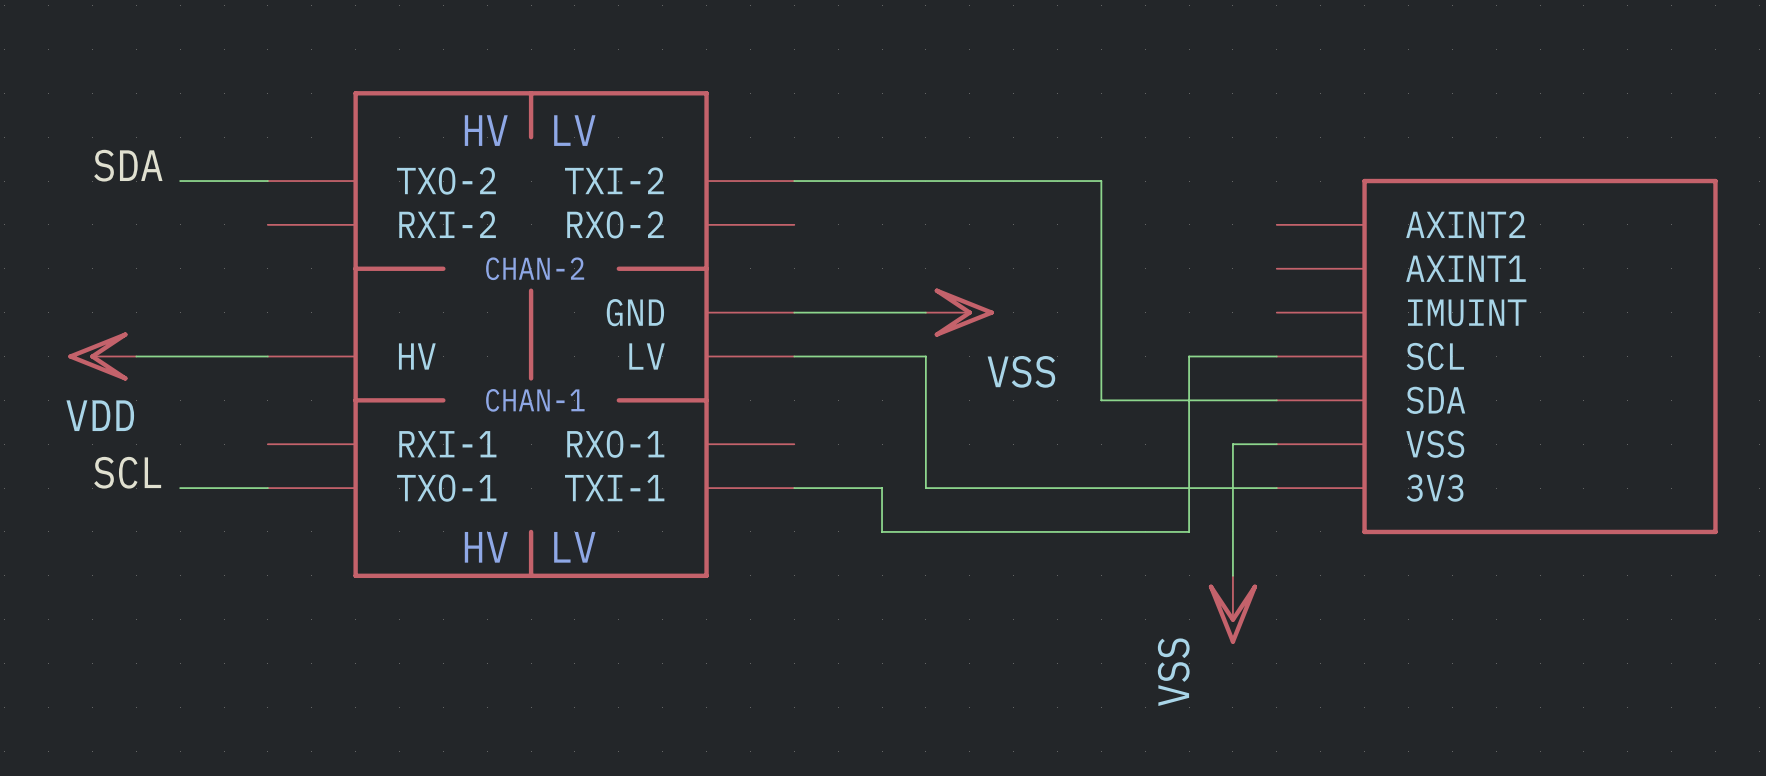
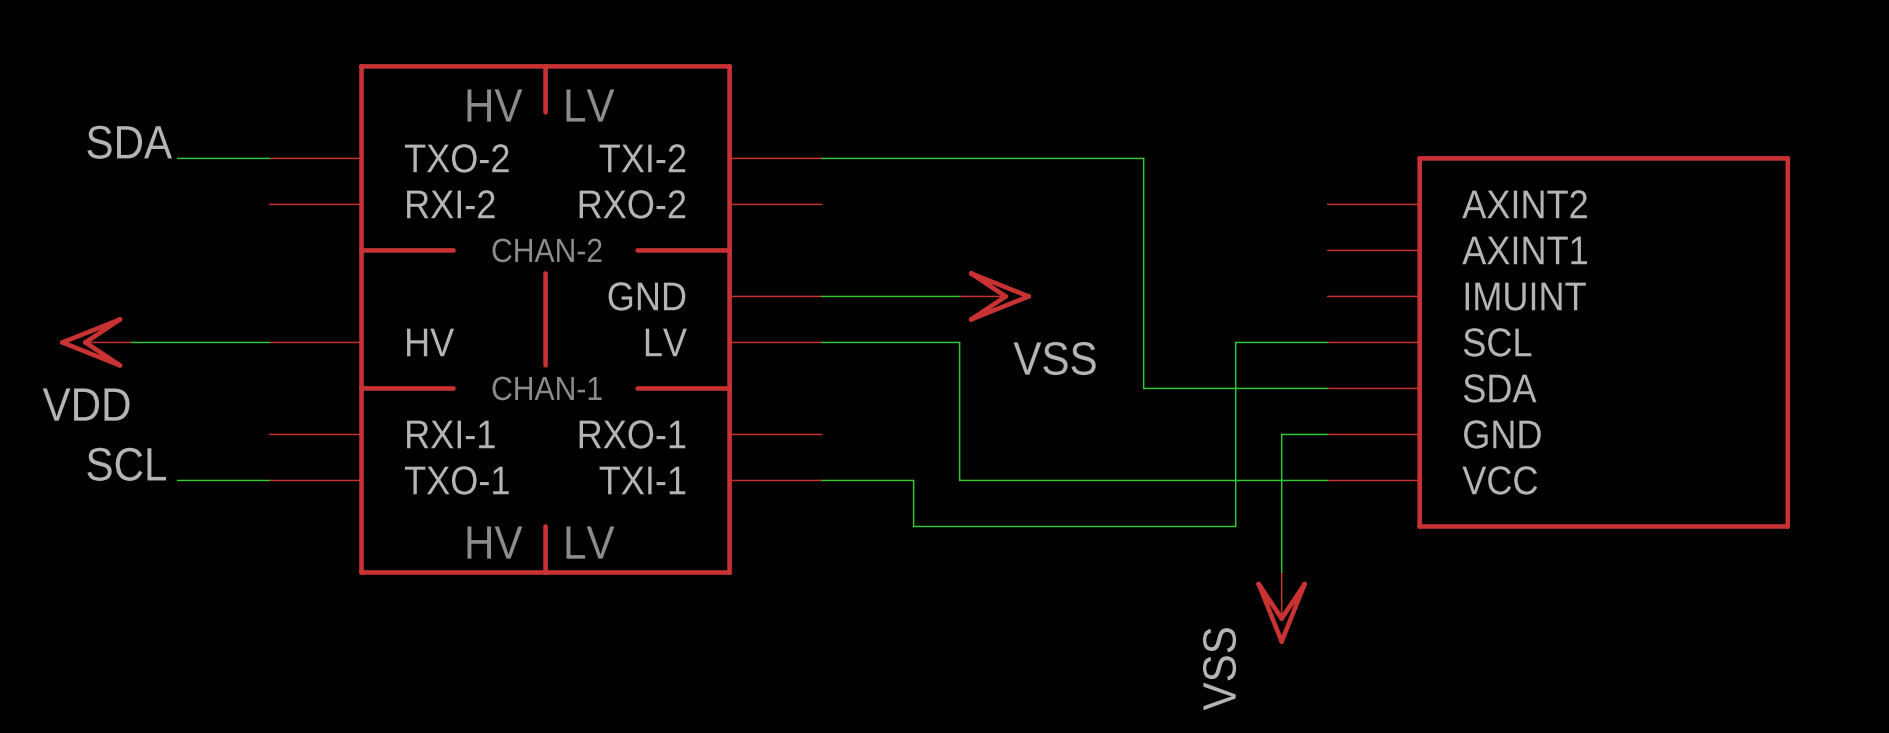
part pin name: VSS (1435, 444) -> GND (1502, 434)
part pin name: 3V3 (1435, 488) -> VCC (1499, 480)

